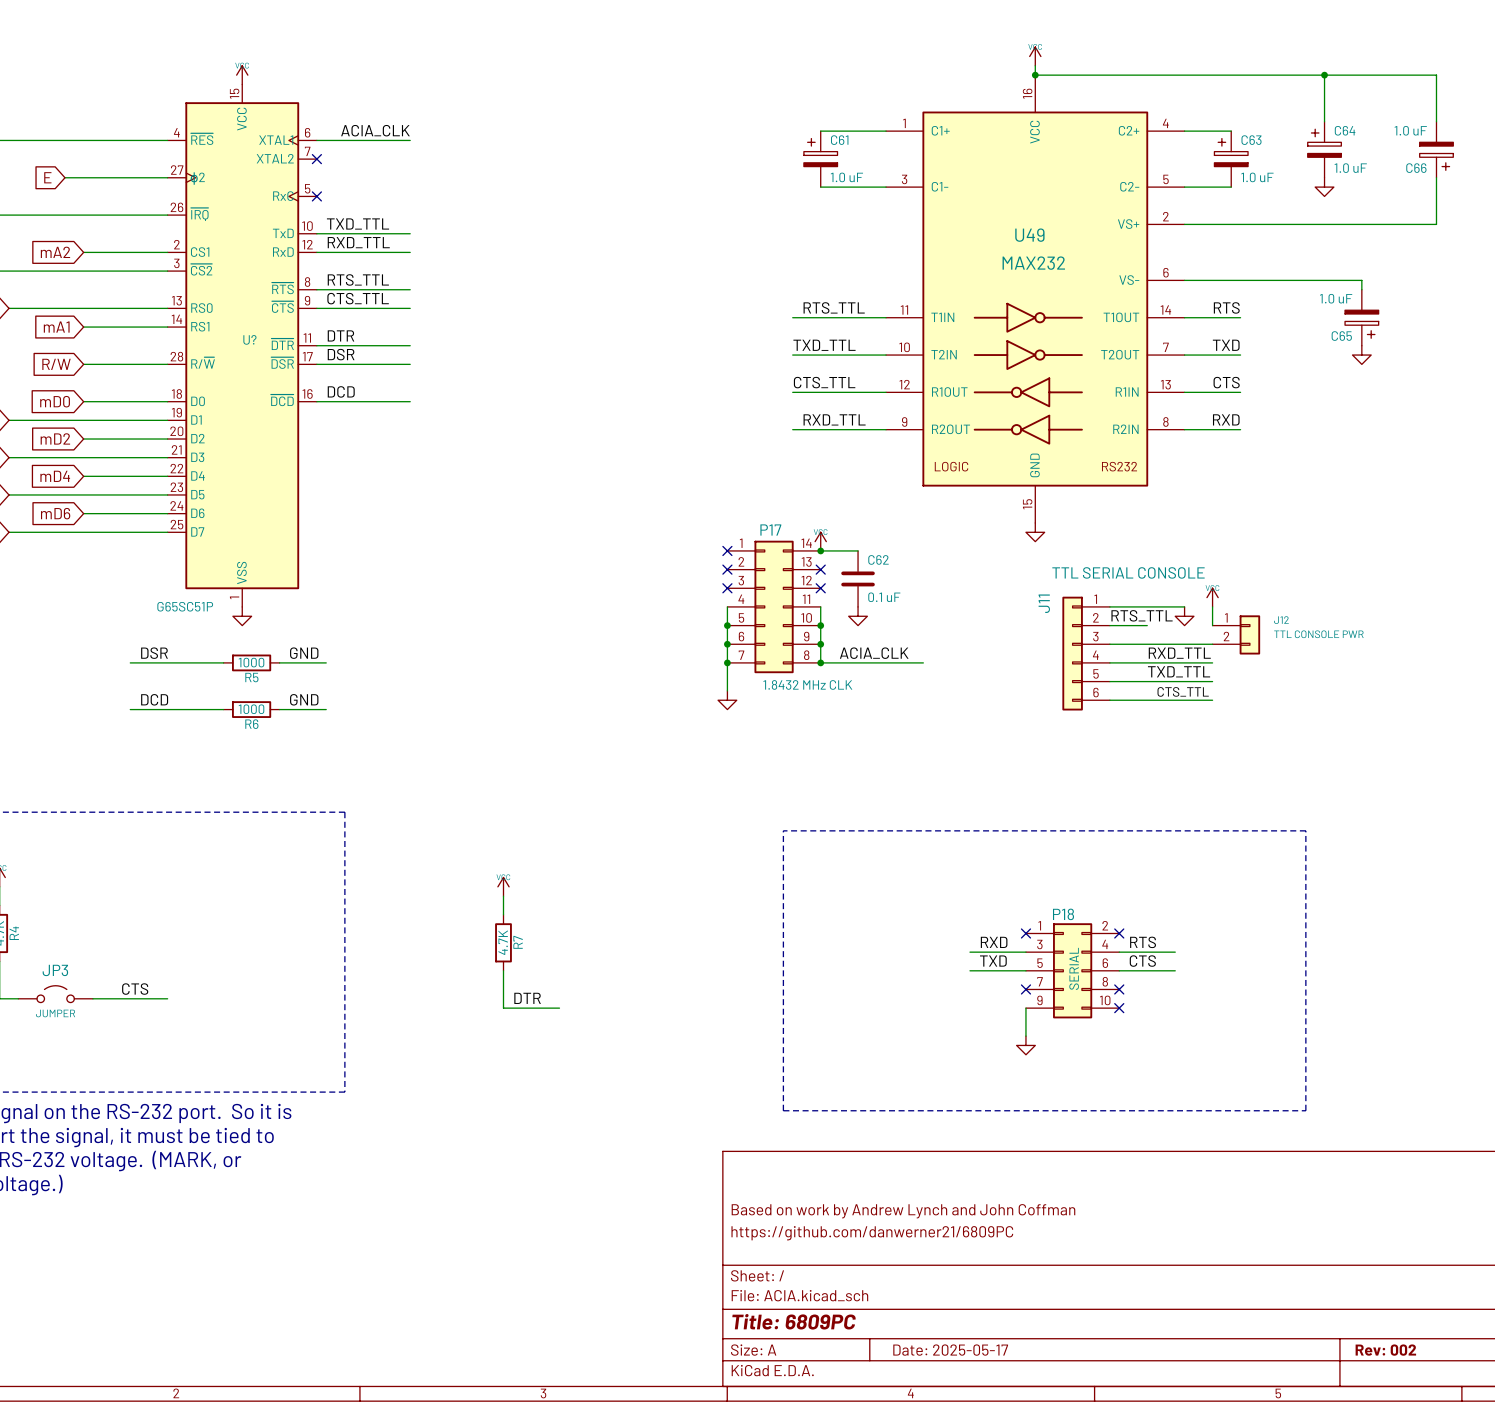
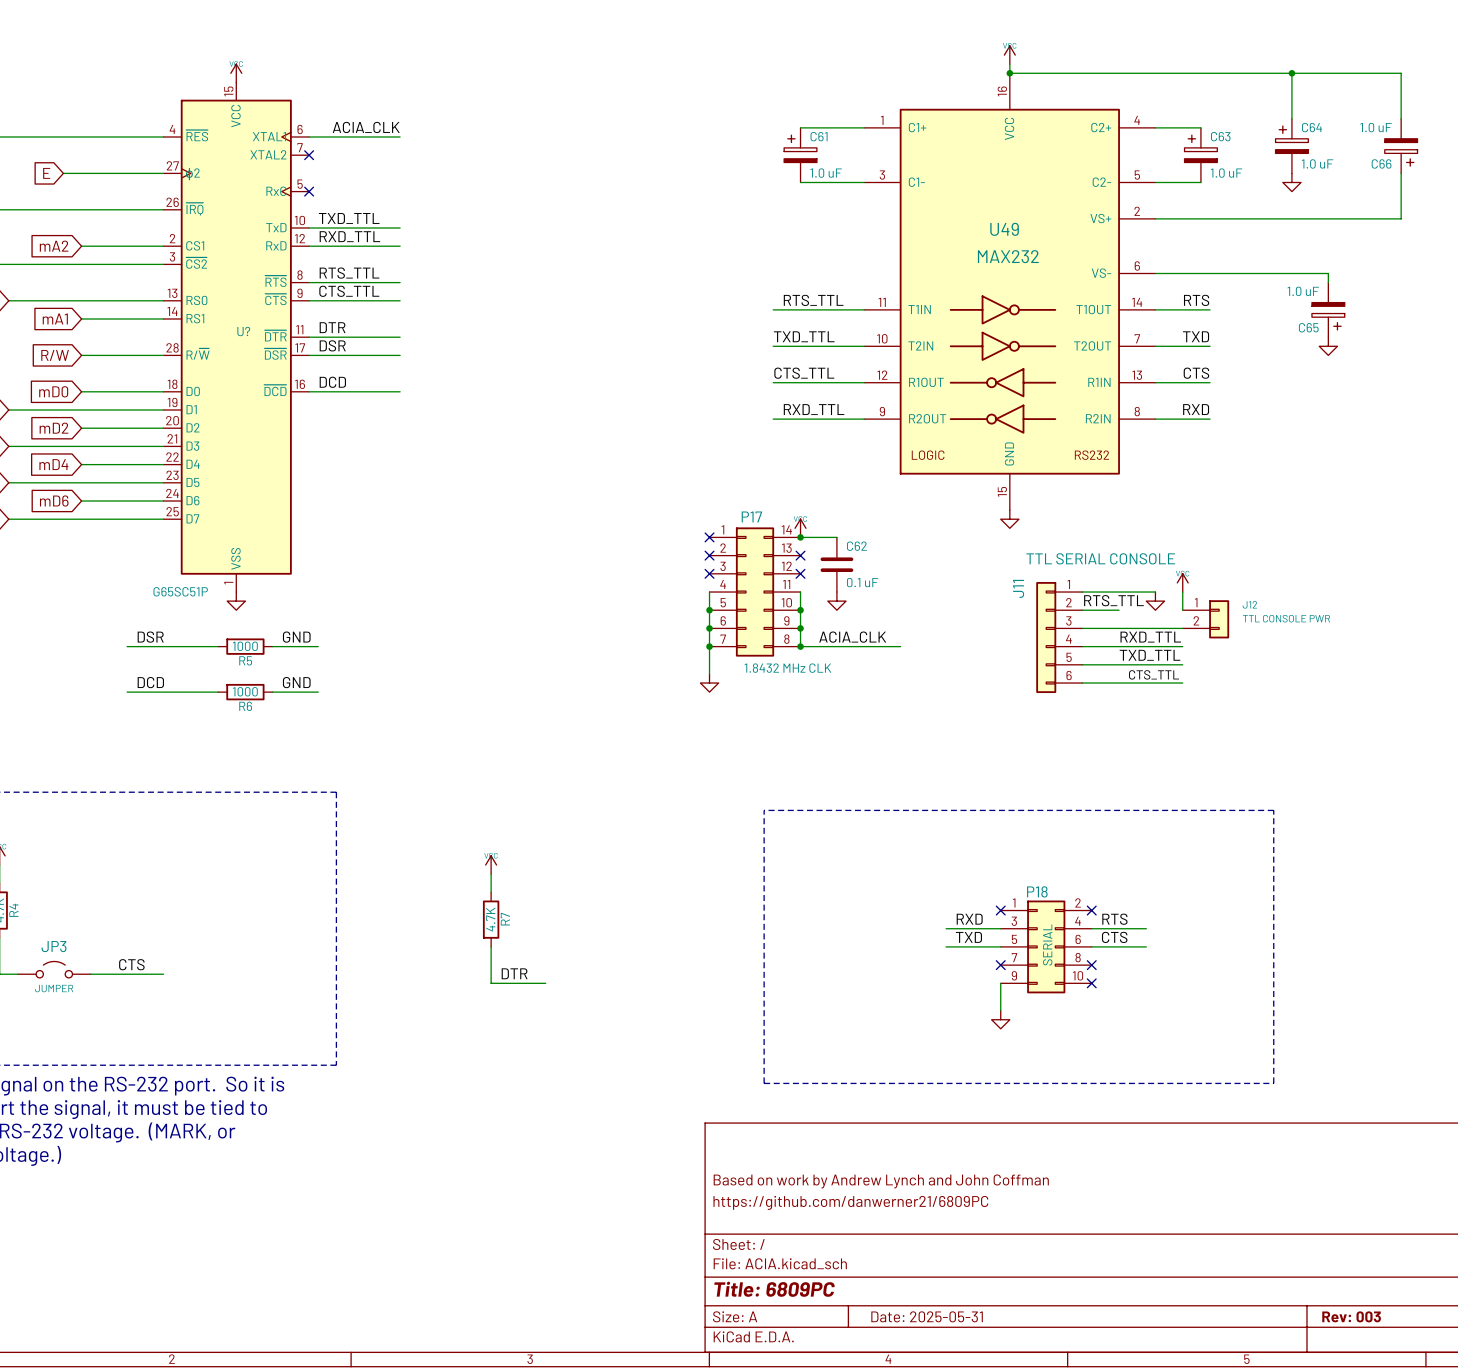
title block: Date: 2025-05-17 (950, 1350) -> Date: 2025-05-31 (927, 1316)
title block: Rev: 002 (1385, 1350) -> Rev: 003 (1351, 1316)

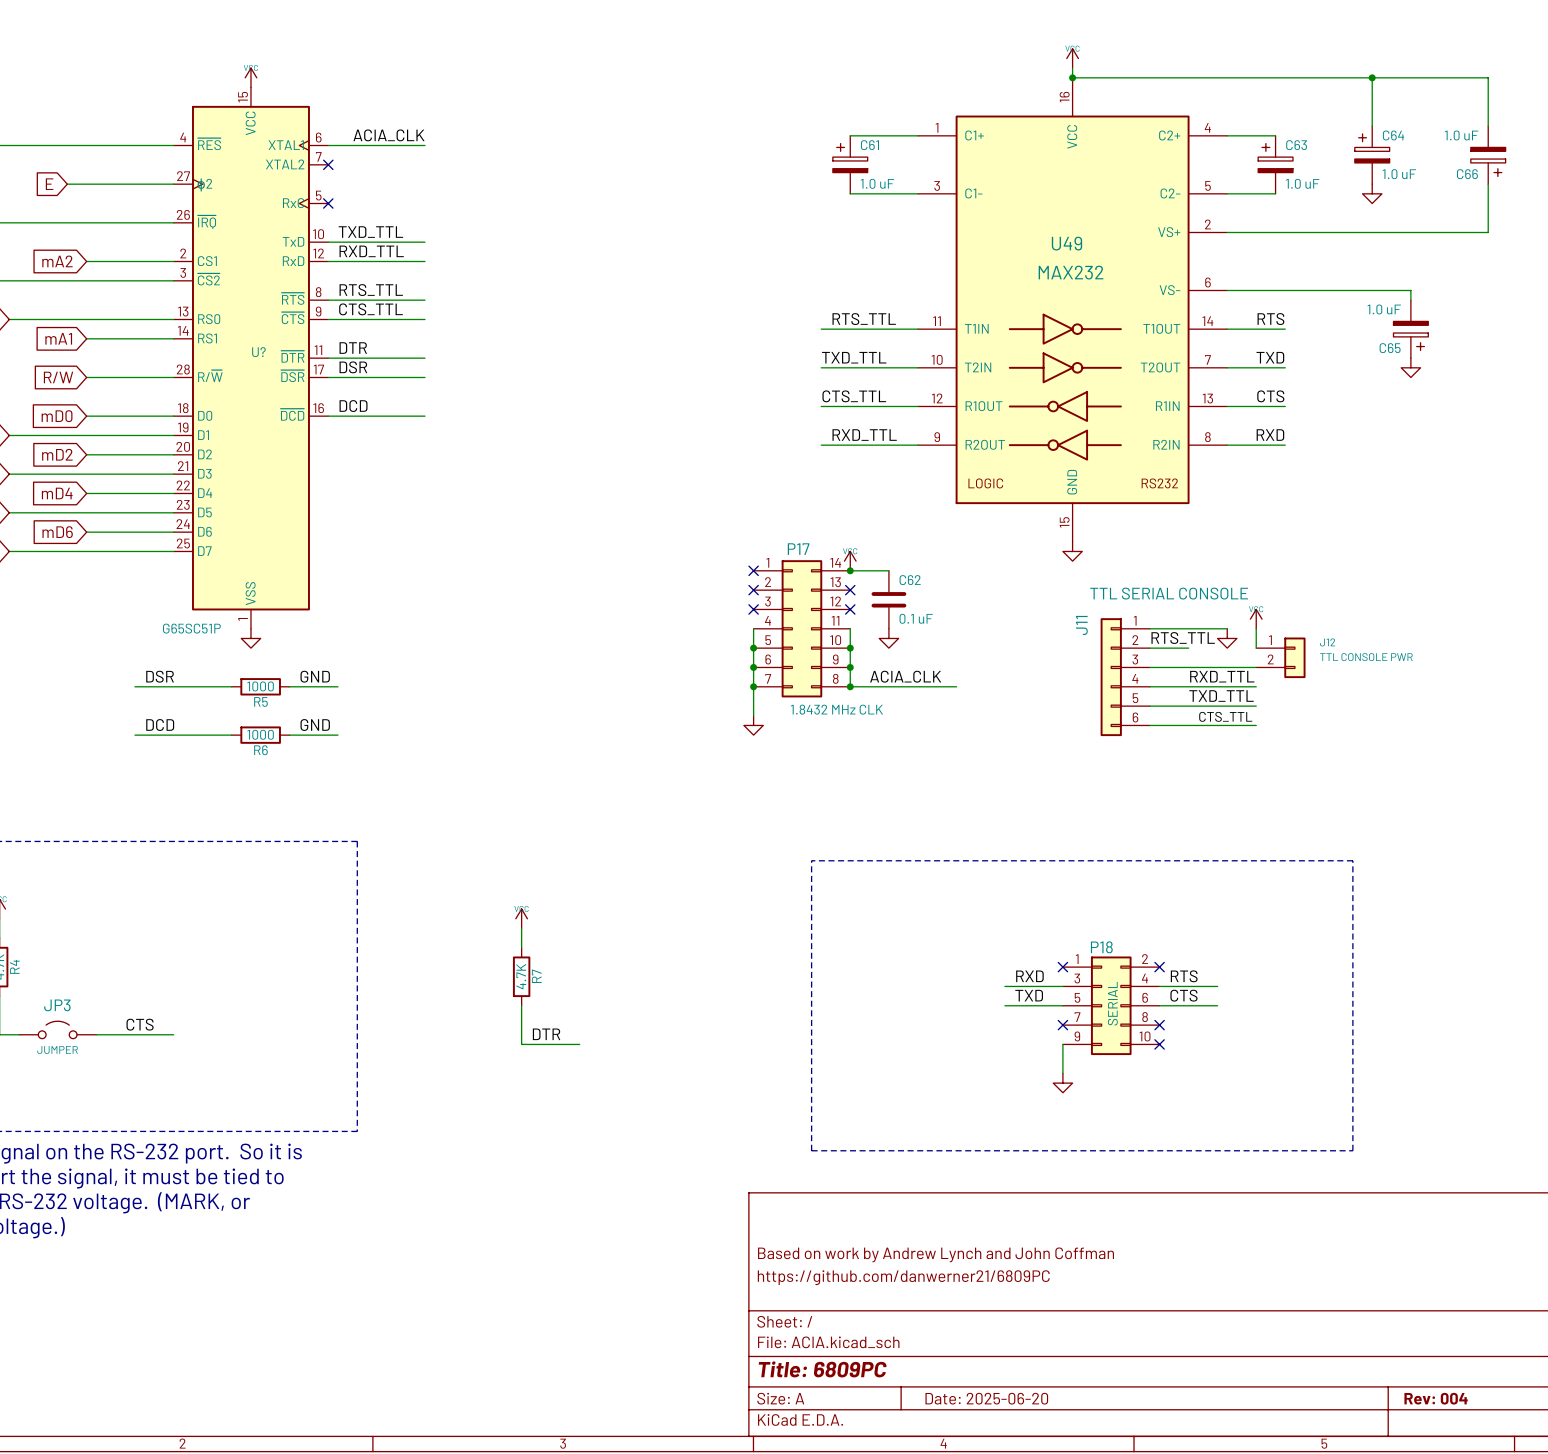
title block: Date: 2025-05-31 (927, 1316) -> Date: 2025-06-20 (986, 1398)
title block: Rev: 003 (1351, 1316) -> Rev: 004 (1436, 1398)

